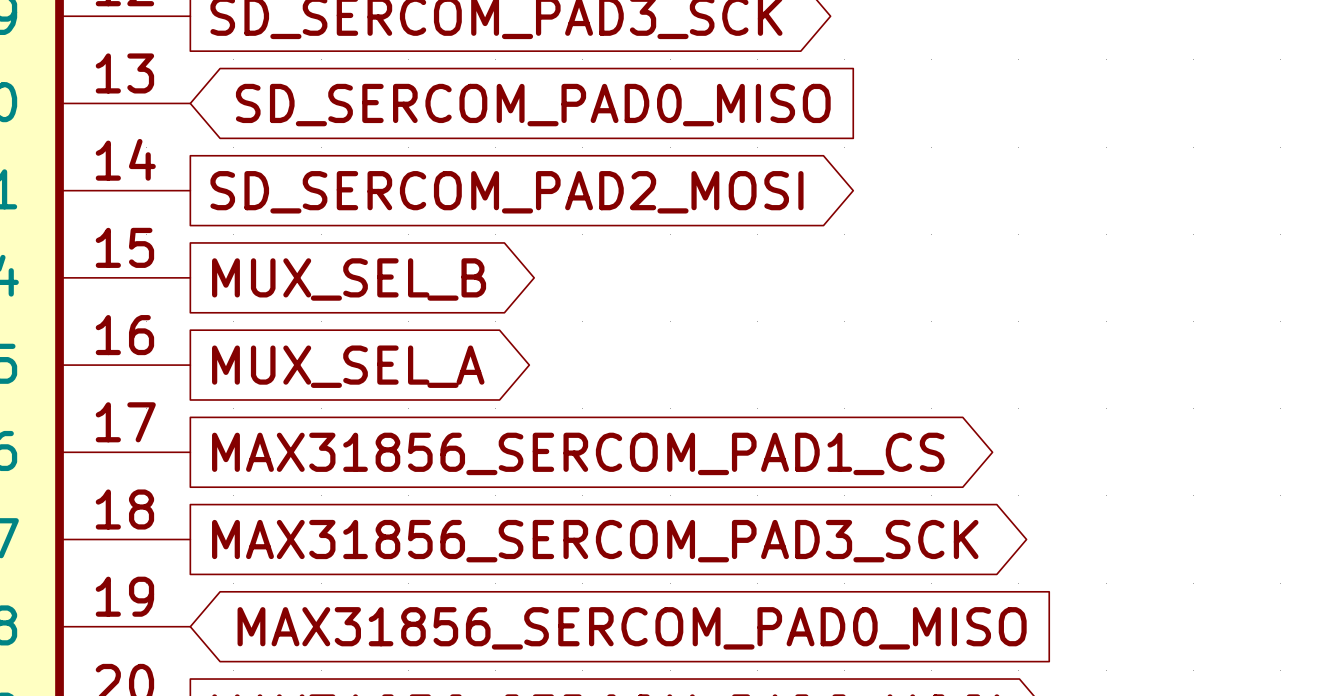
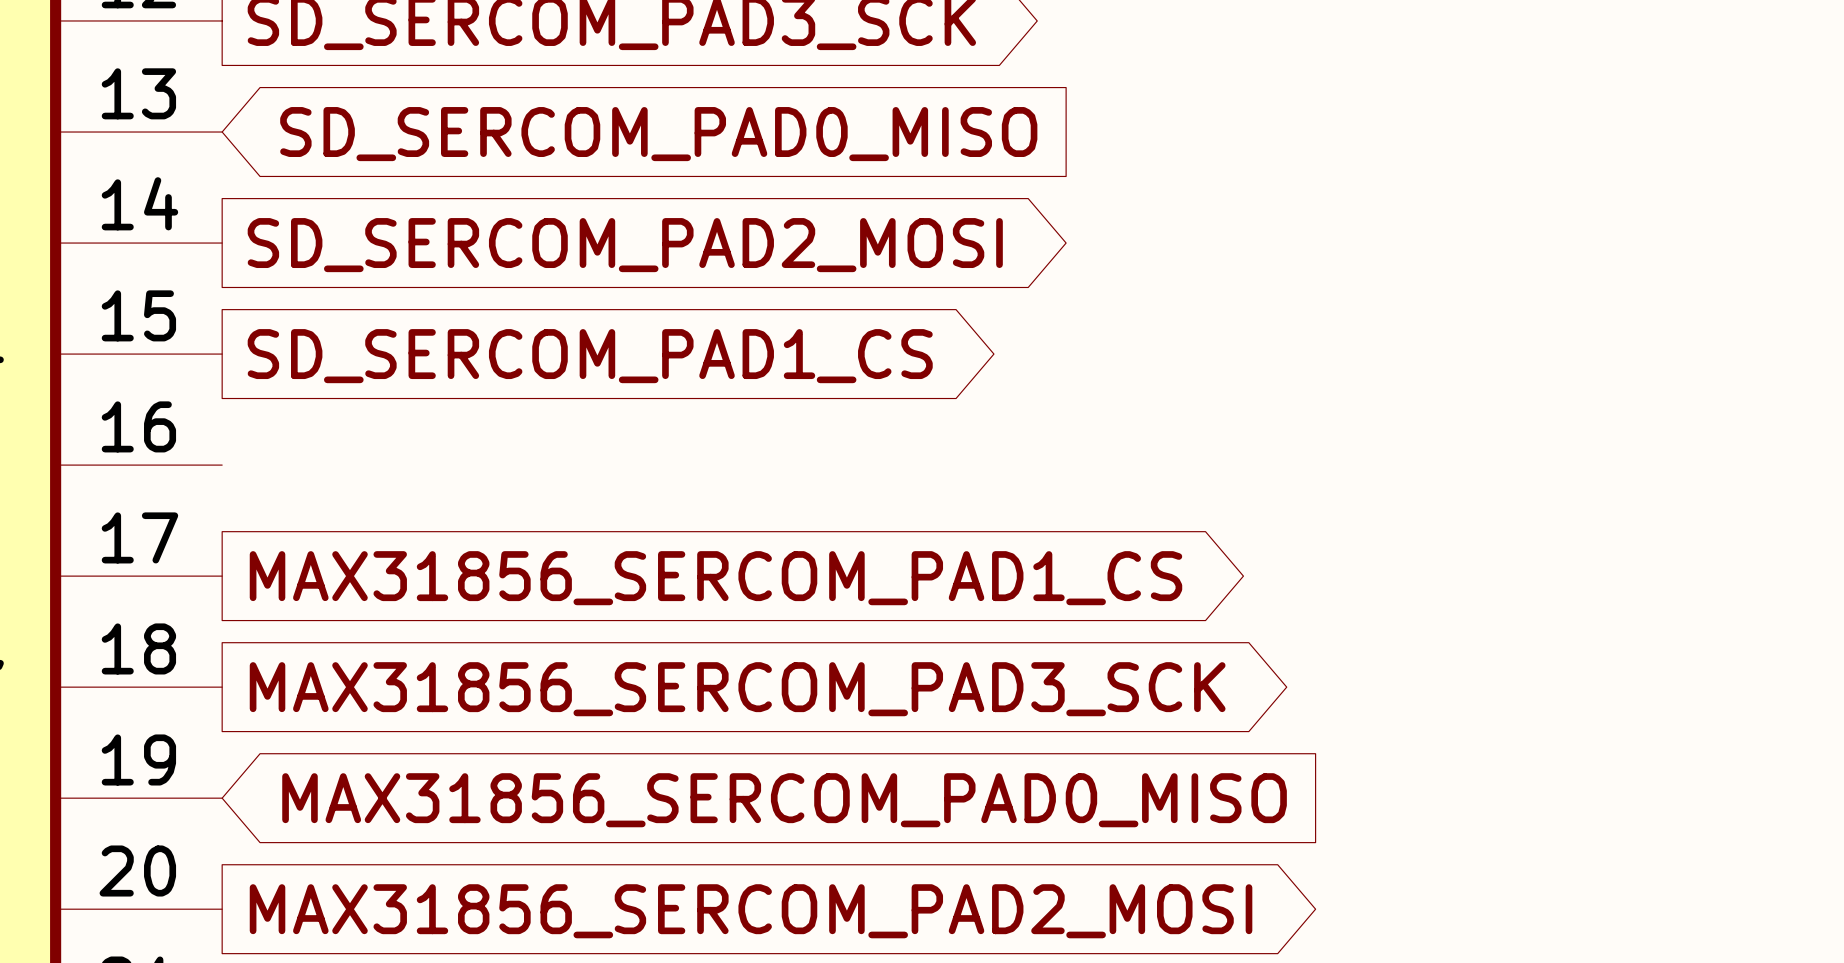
global label: MUX_SEL_B (349, 279) -> SD_SERCOM_PAD1_CS (590, 356)
global label: MUX_SEL_A (348, 366) -> none

